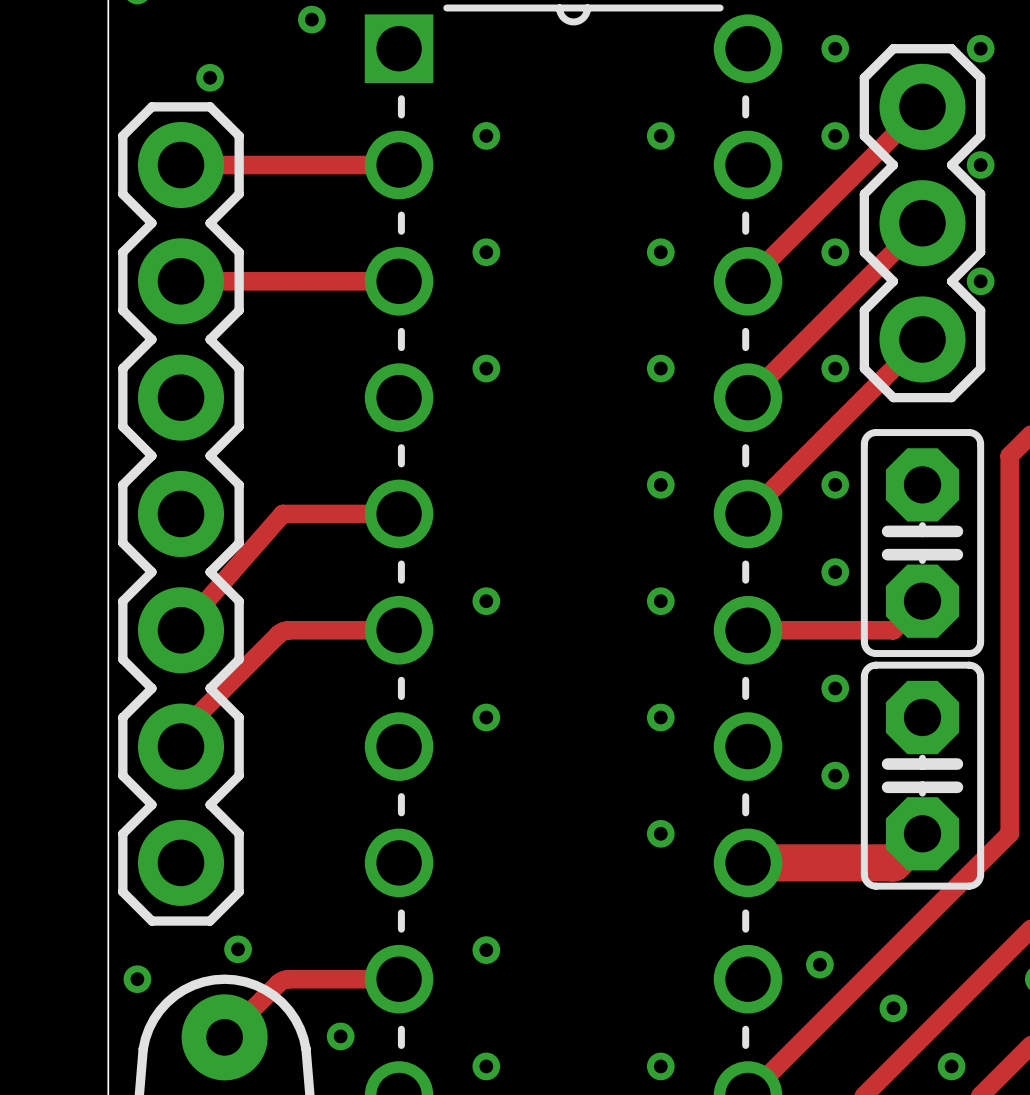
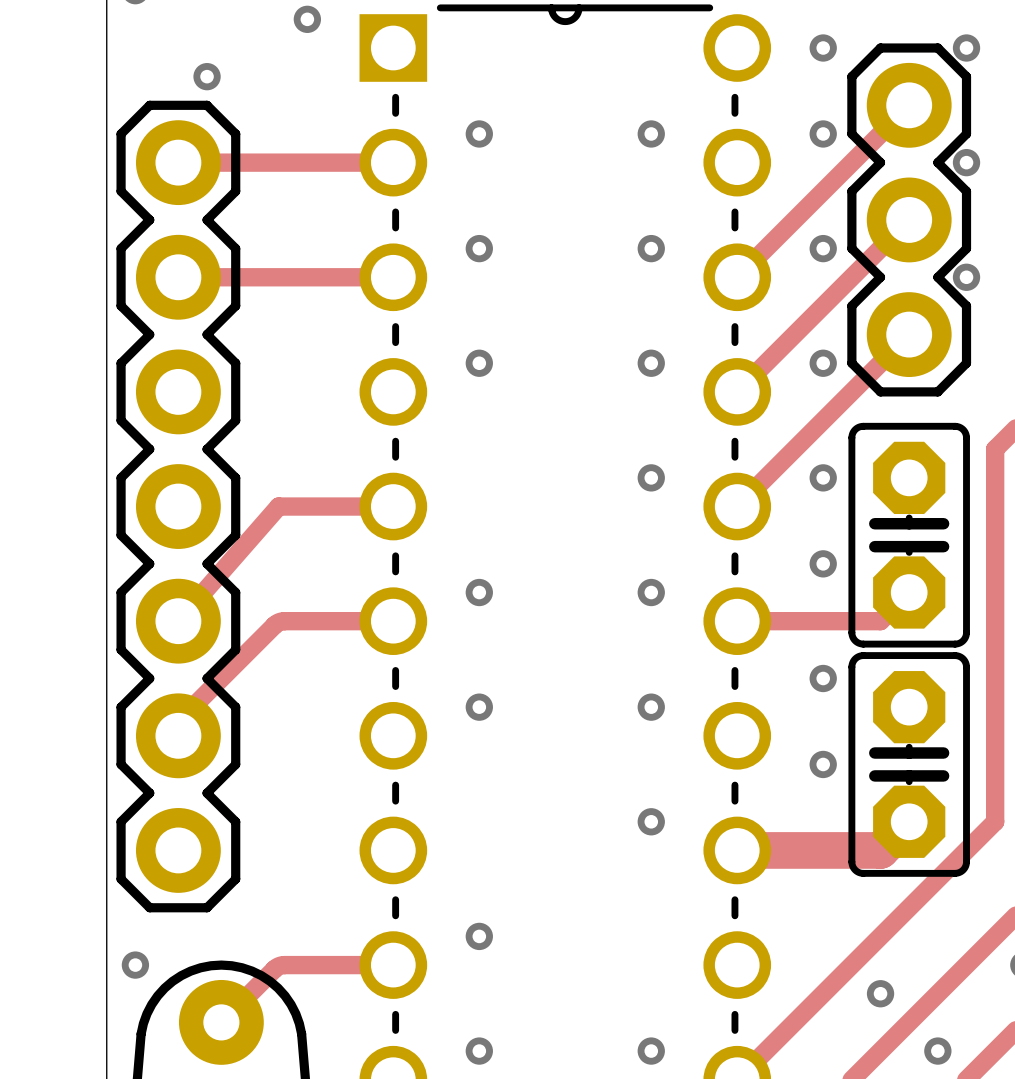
via: (238, 949) -> none
via: (819, 964) -> none
via: (340, 1036) -> none

